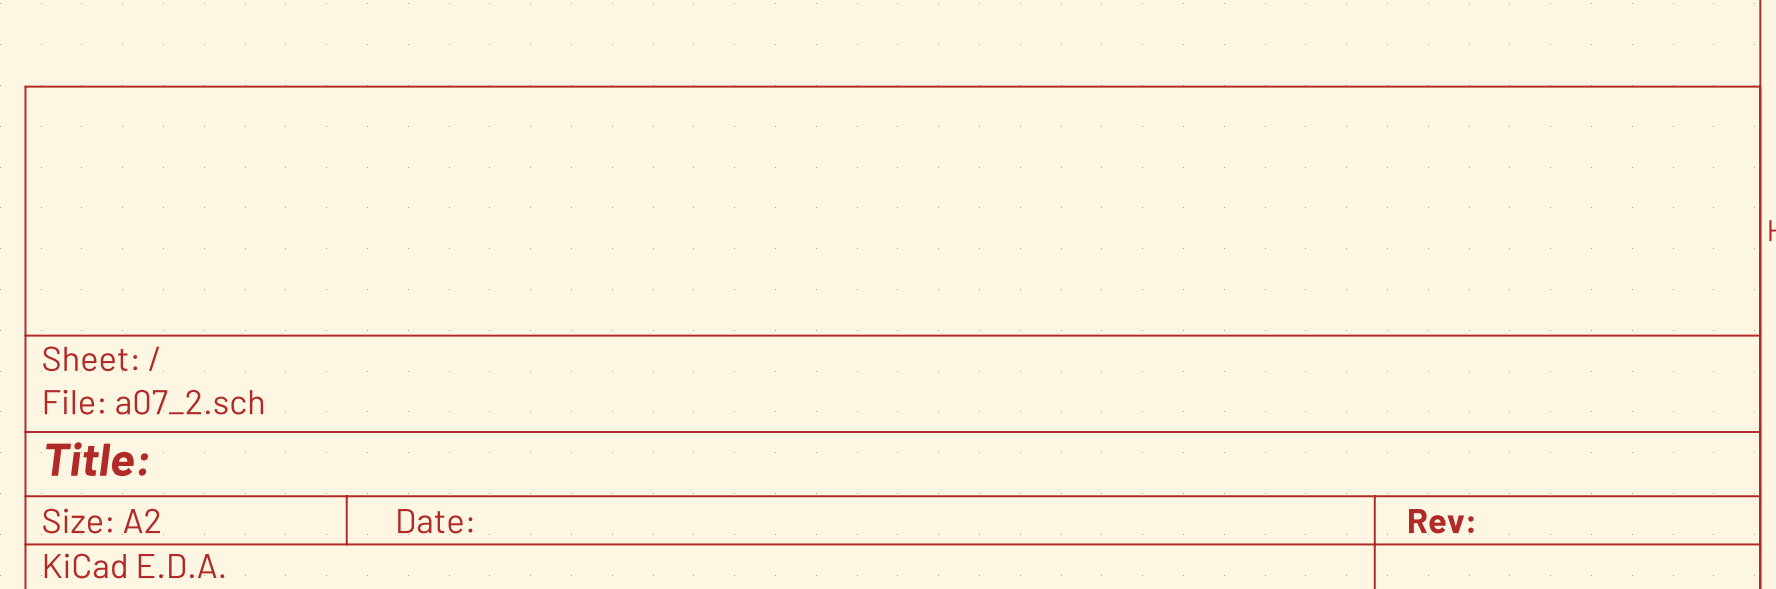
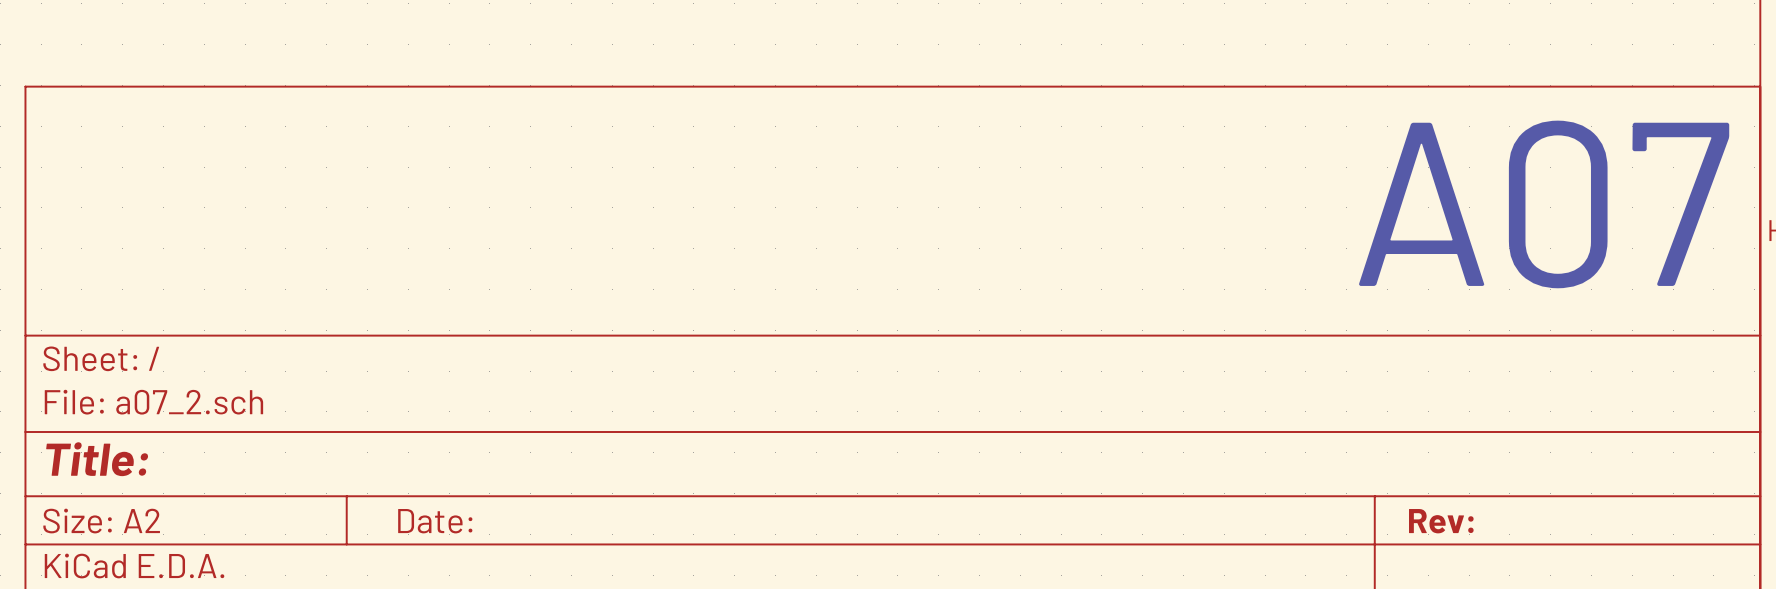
text: none -> A07 (1543, 204)

